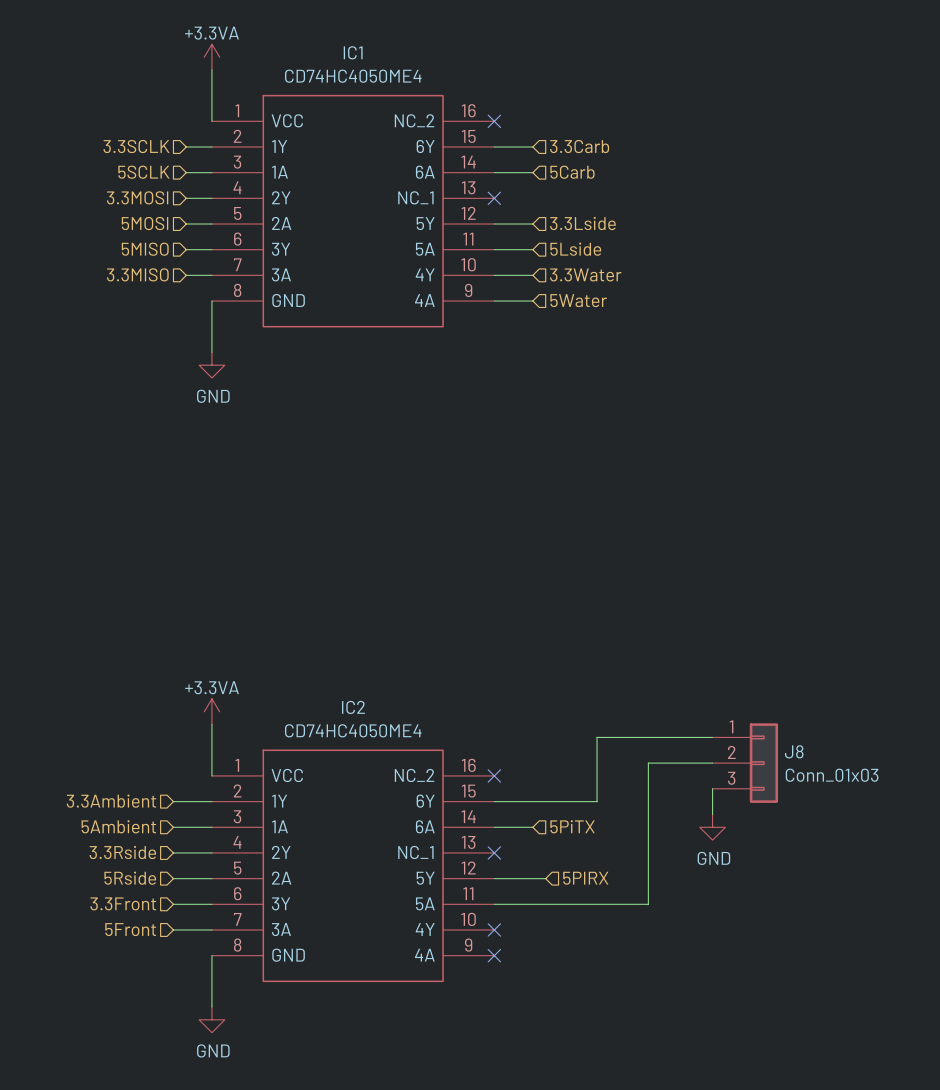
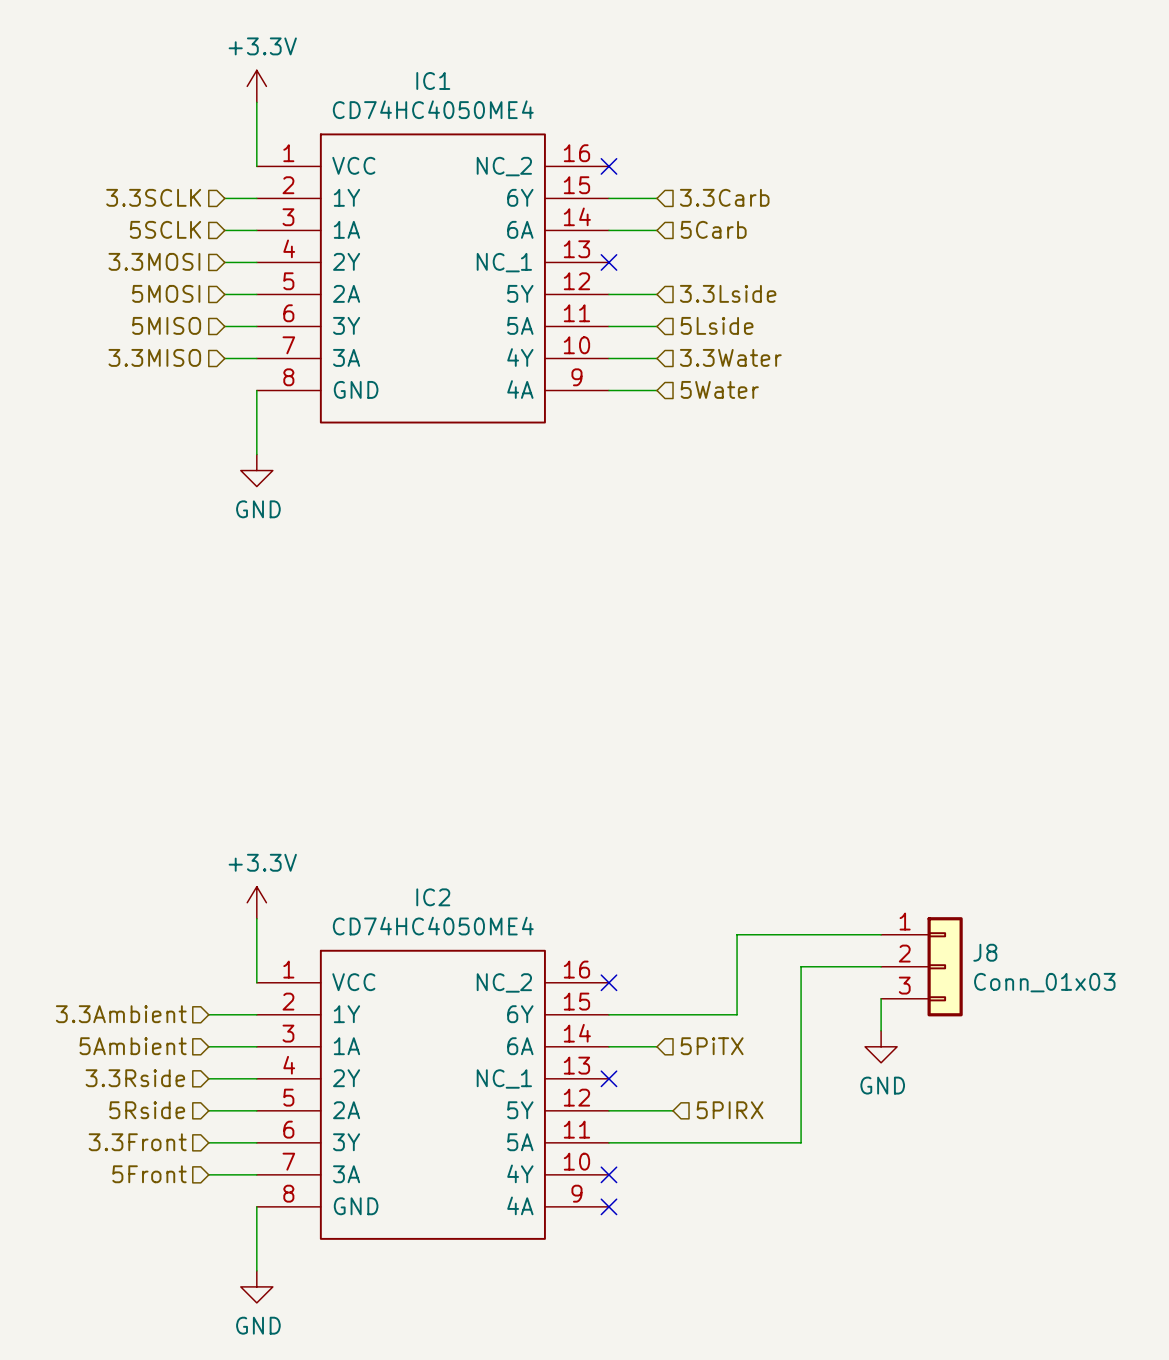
power symbol: +3.3VA (211, 57) -> +3.3V (256, 86)
power symbol: +3.3VA (211, 711) -> +3.3V (256, 902)

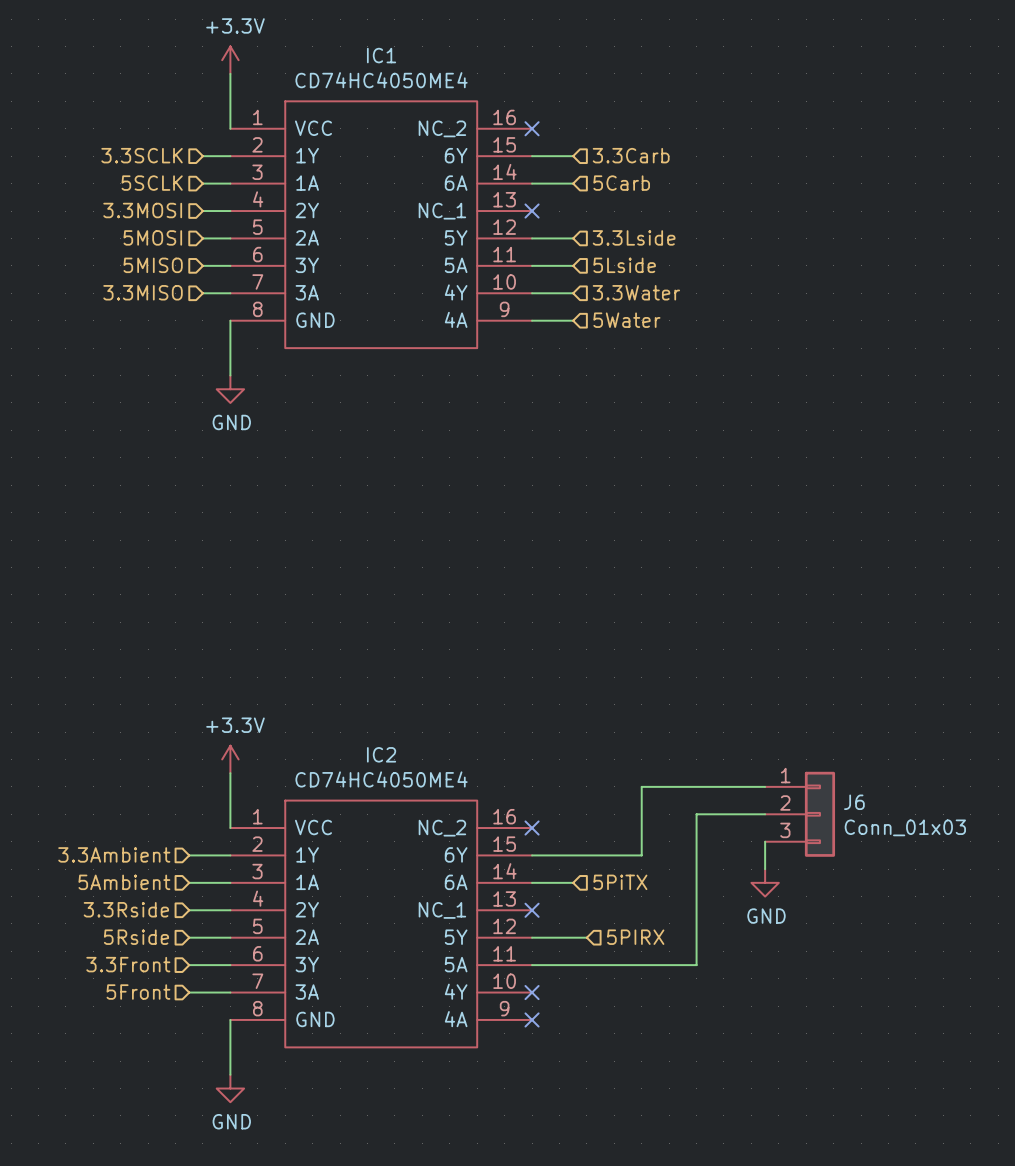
J8 name: J8 (985, 952) -> J6 (854, 802)

